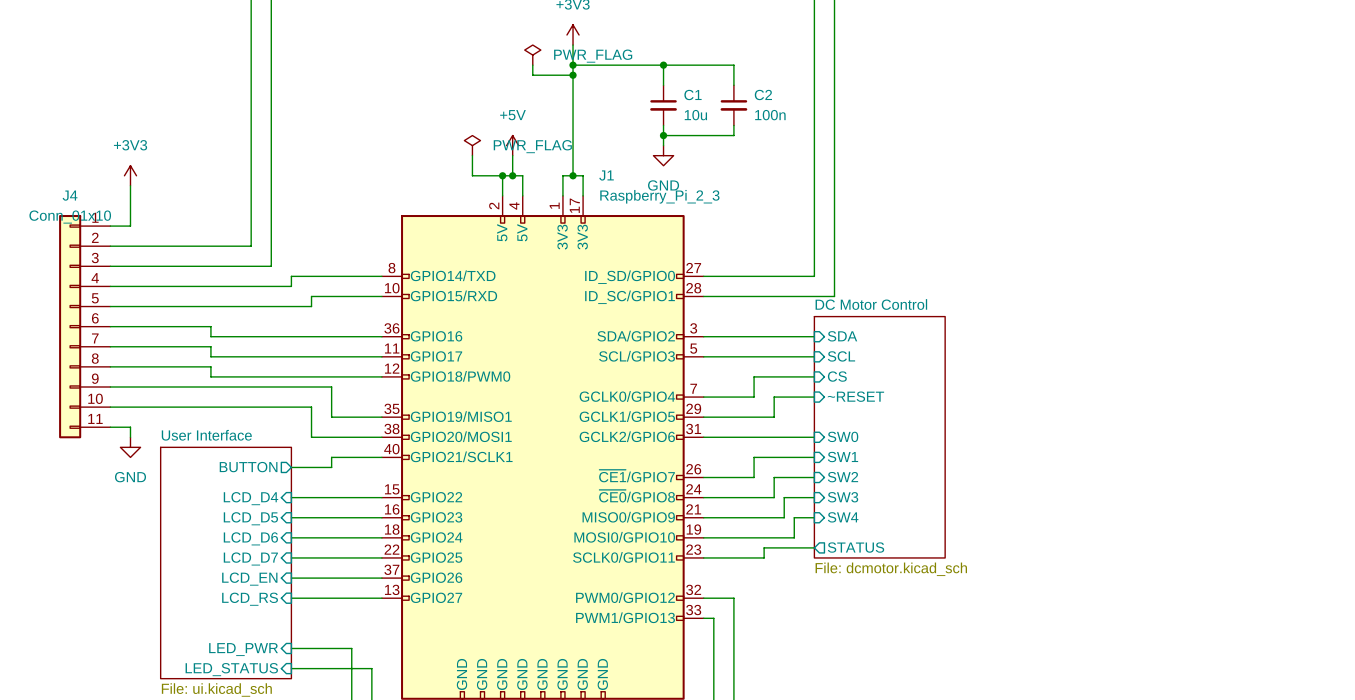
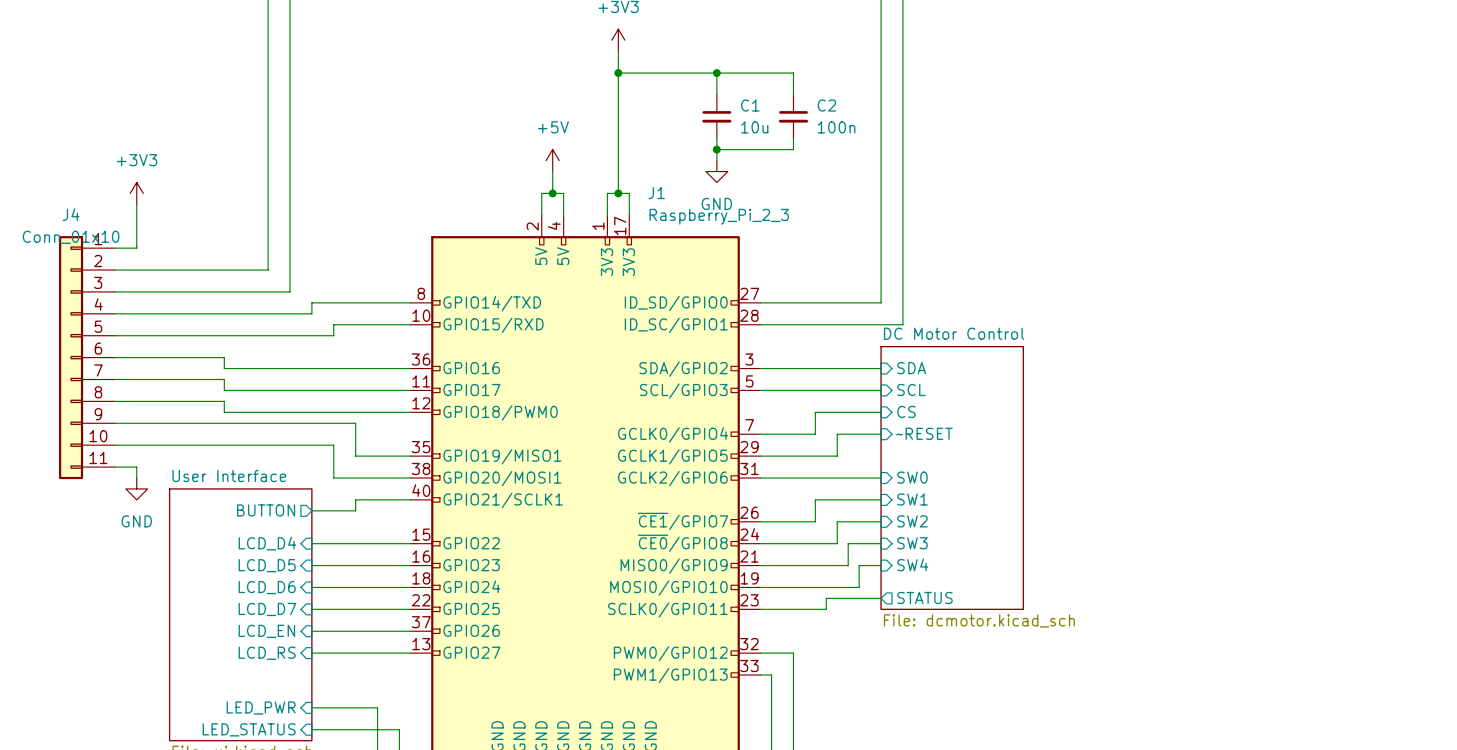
power symbol: PWR_FLAG (532, 55) -> none
wire: (532, 65) (532, 75) (573, 75) -> none
junction: (573, 75) -> none
power symbol: PWR_FLAG (472, 145) -> none
wire: (472, 155) (472, 175) (502, 175) -> none
junction: (502, 175) -> none

